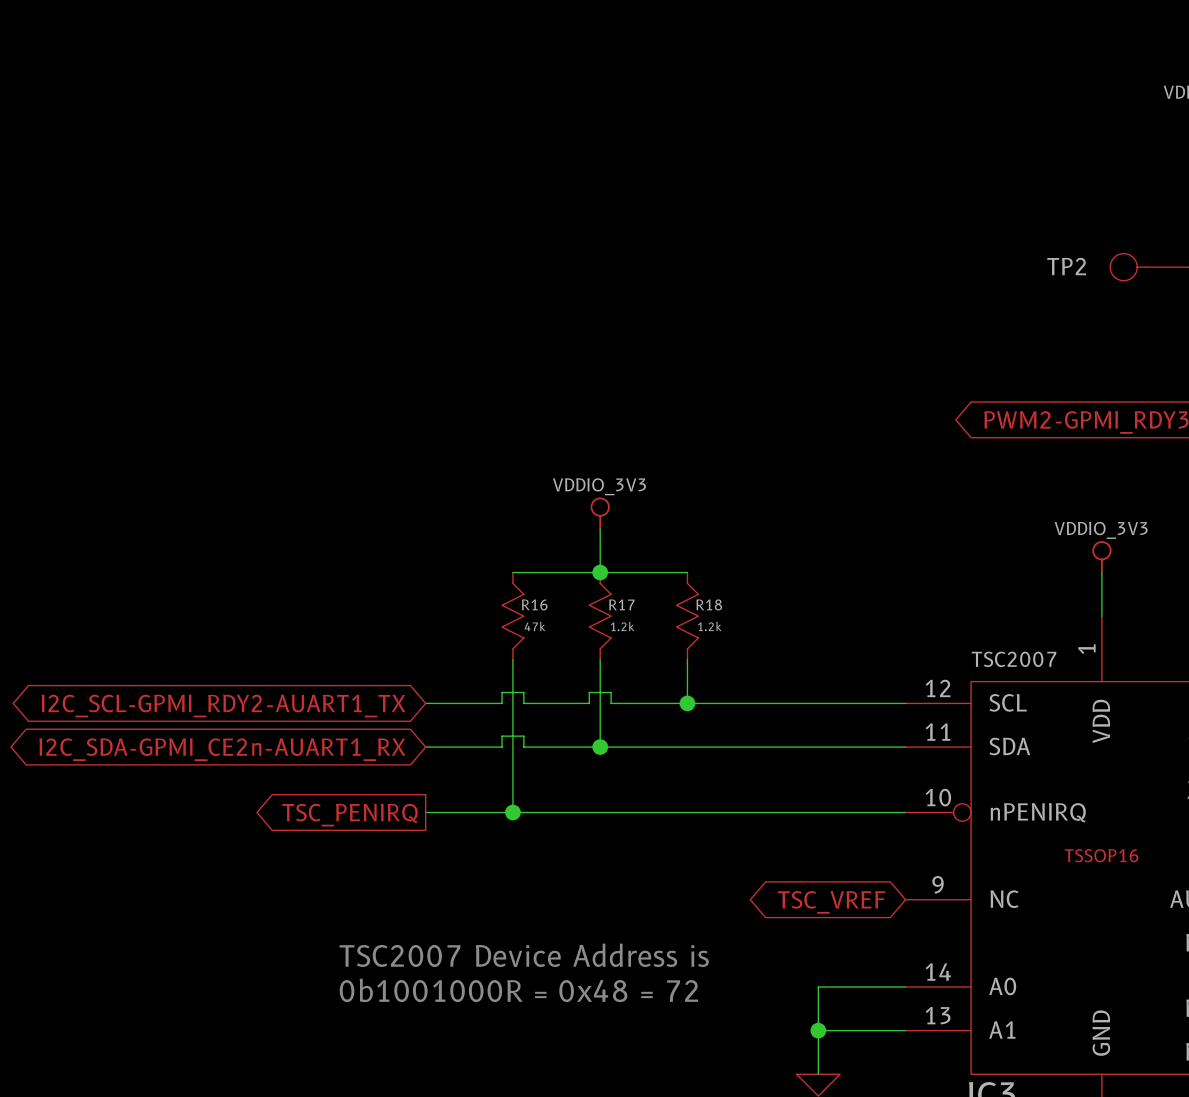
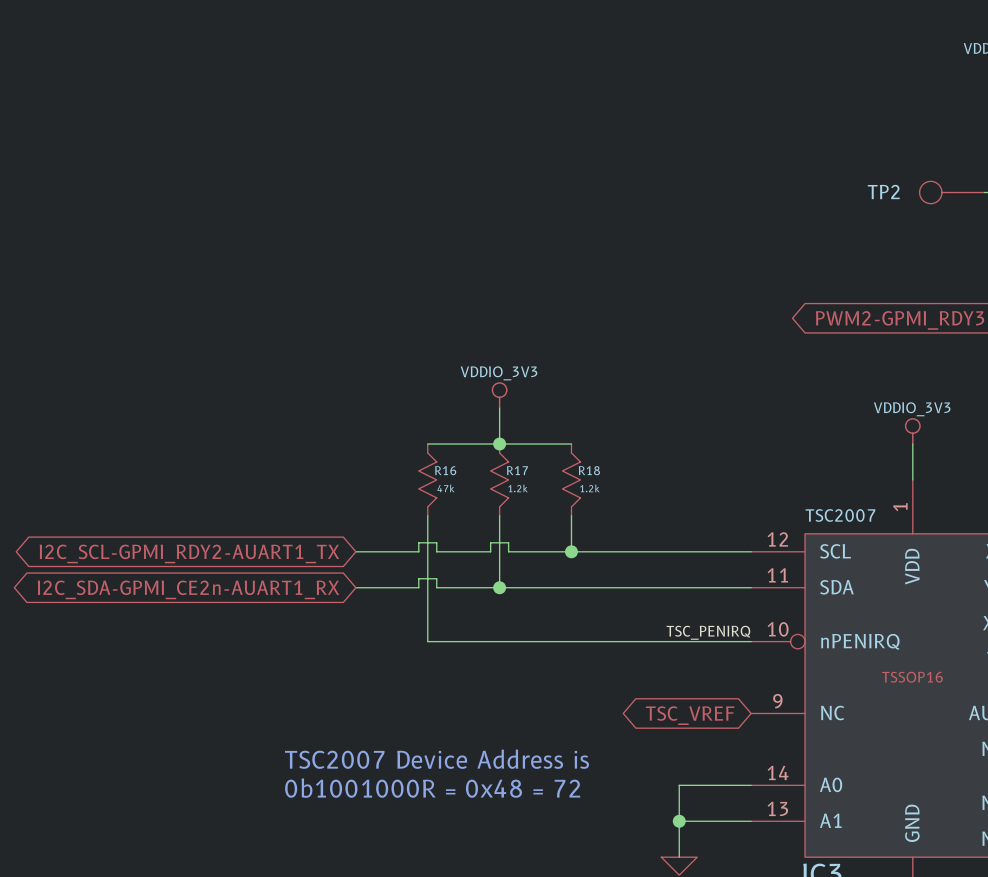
label: none -> TSC_PENIRQ (708, 632)
wire: (425, 812) (512, 812) -> none
junction: (512, 812) -> none
global label: TSC_PENIRQ (350, 815) -> none

